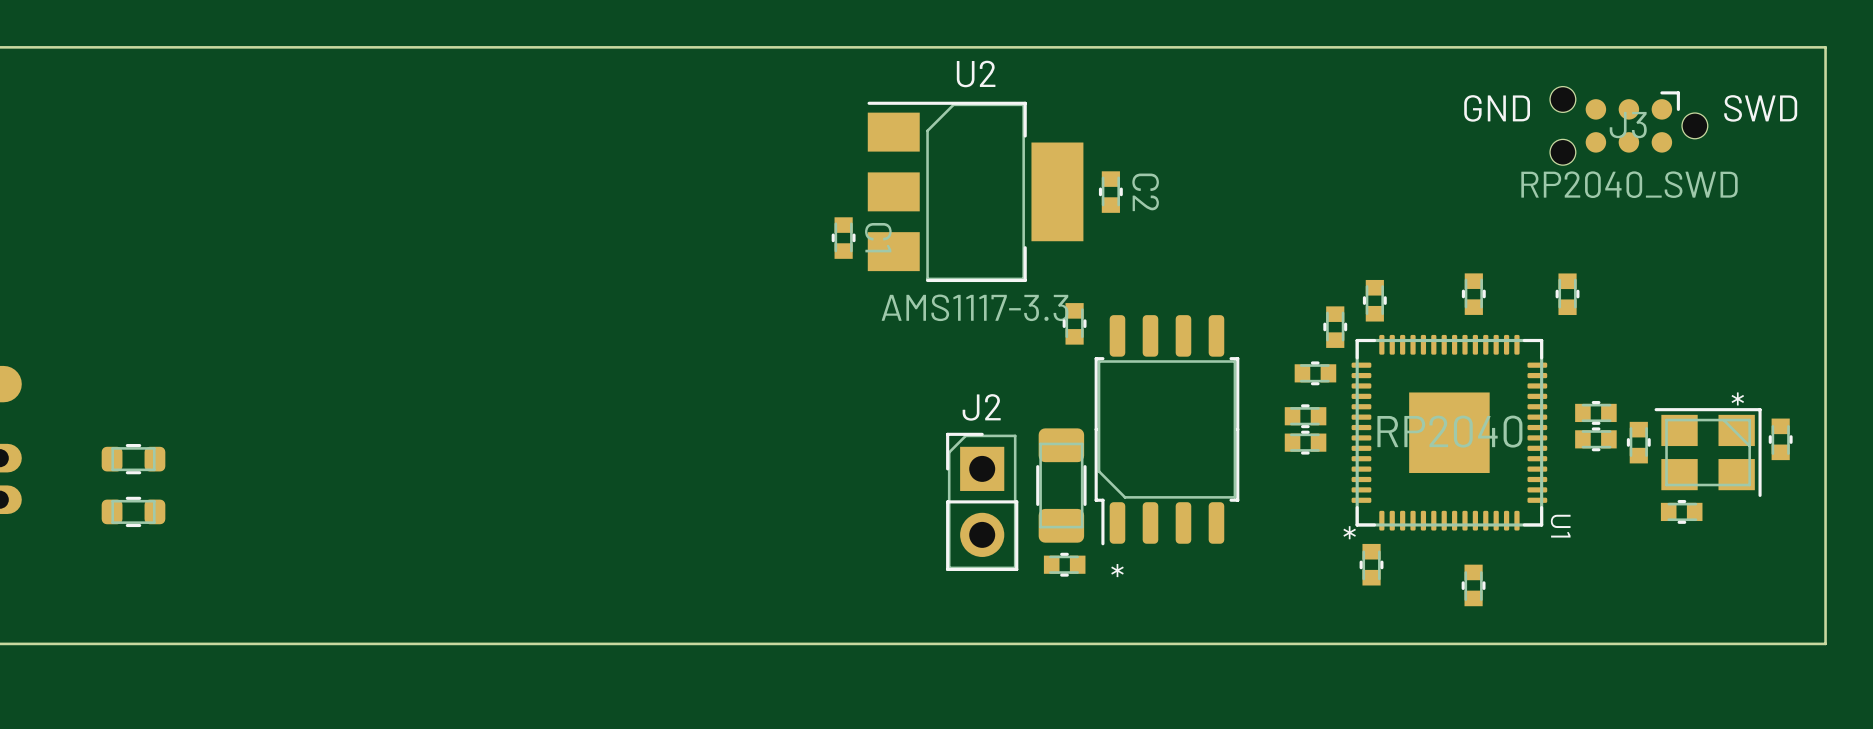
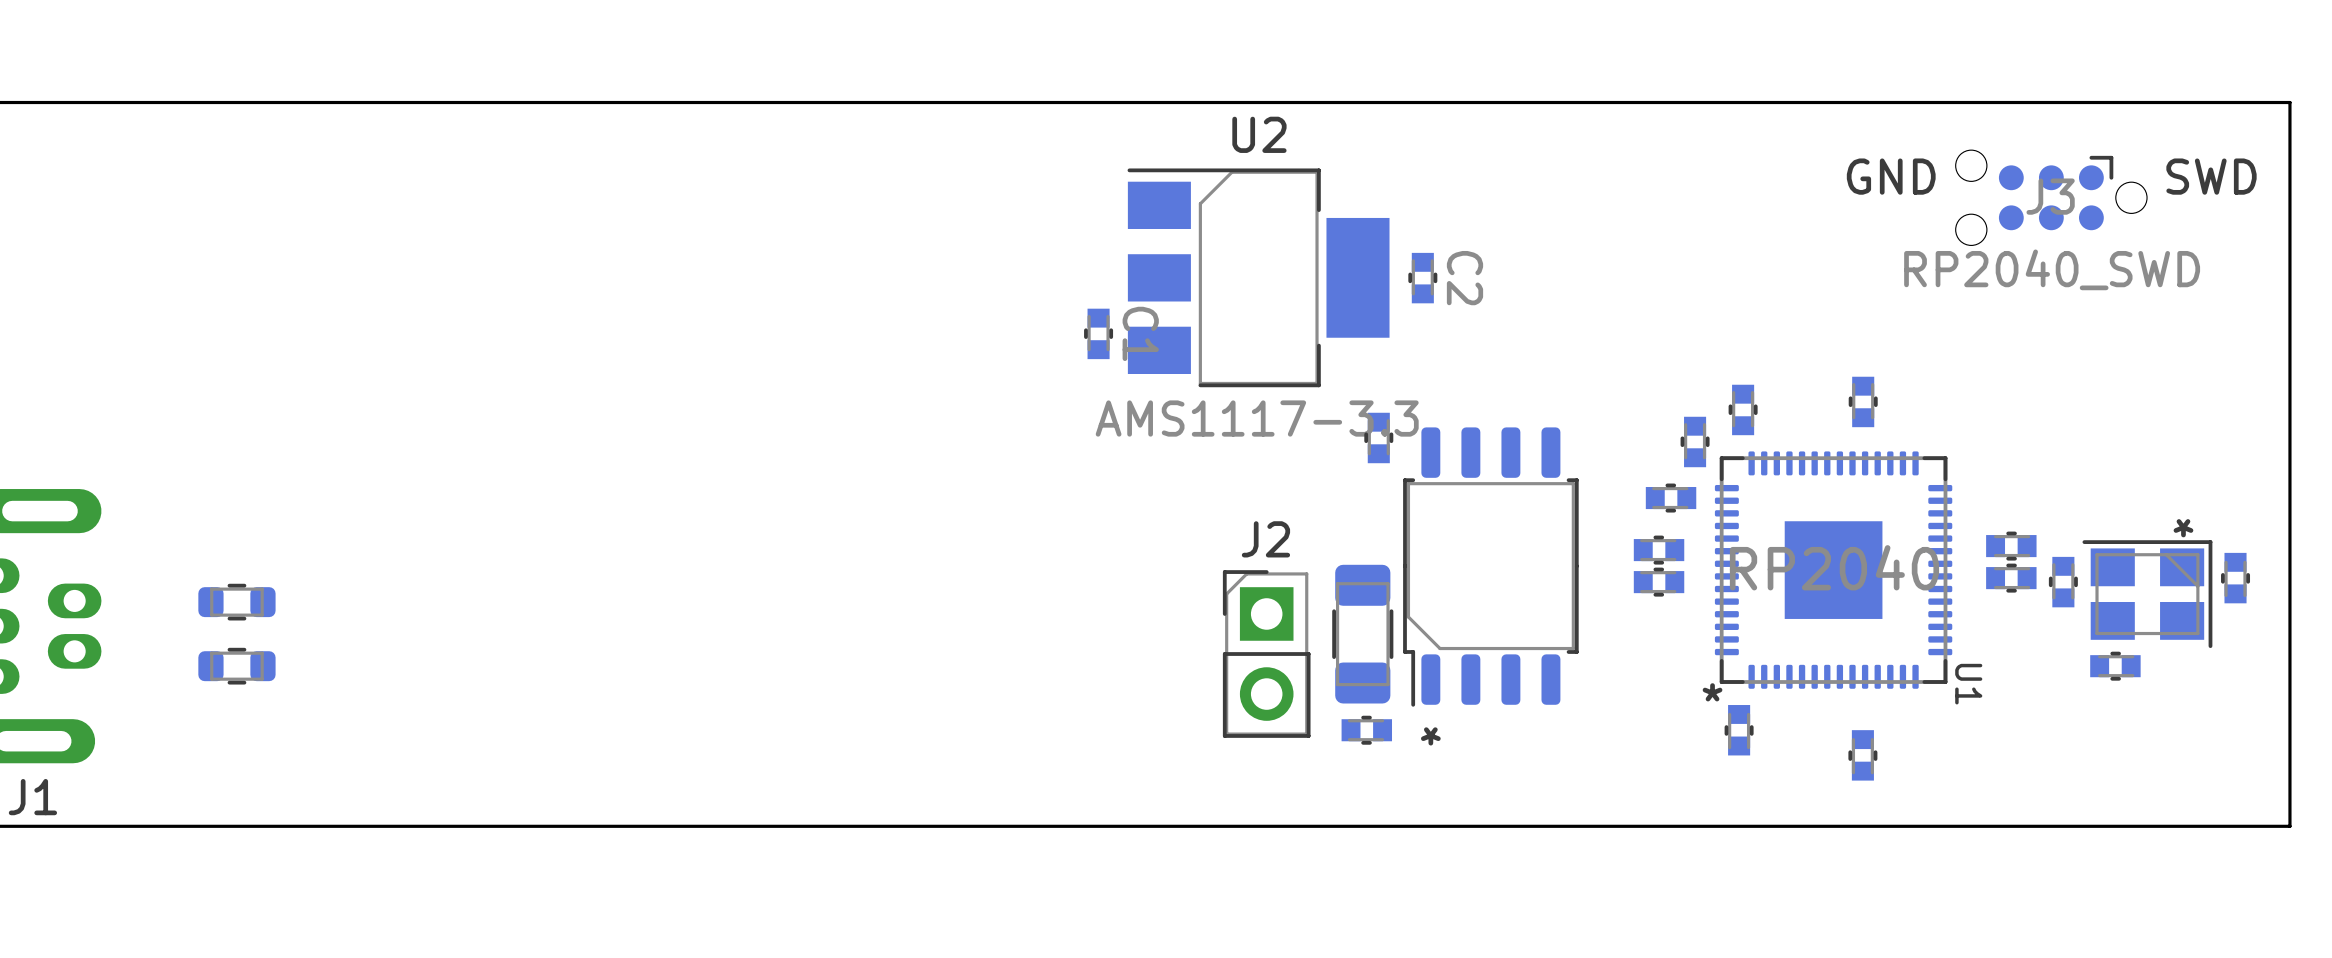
part: (1567, 294) -> none

